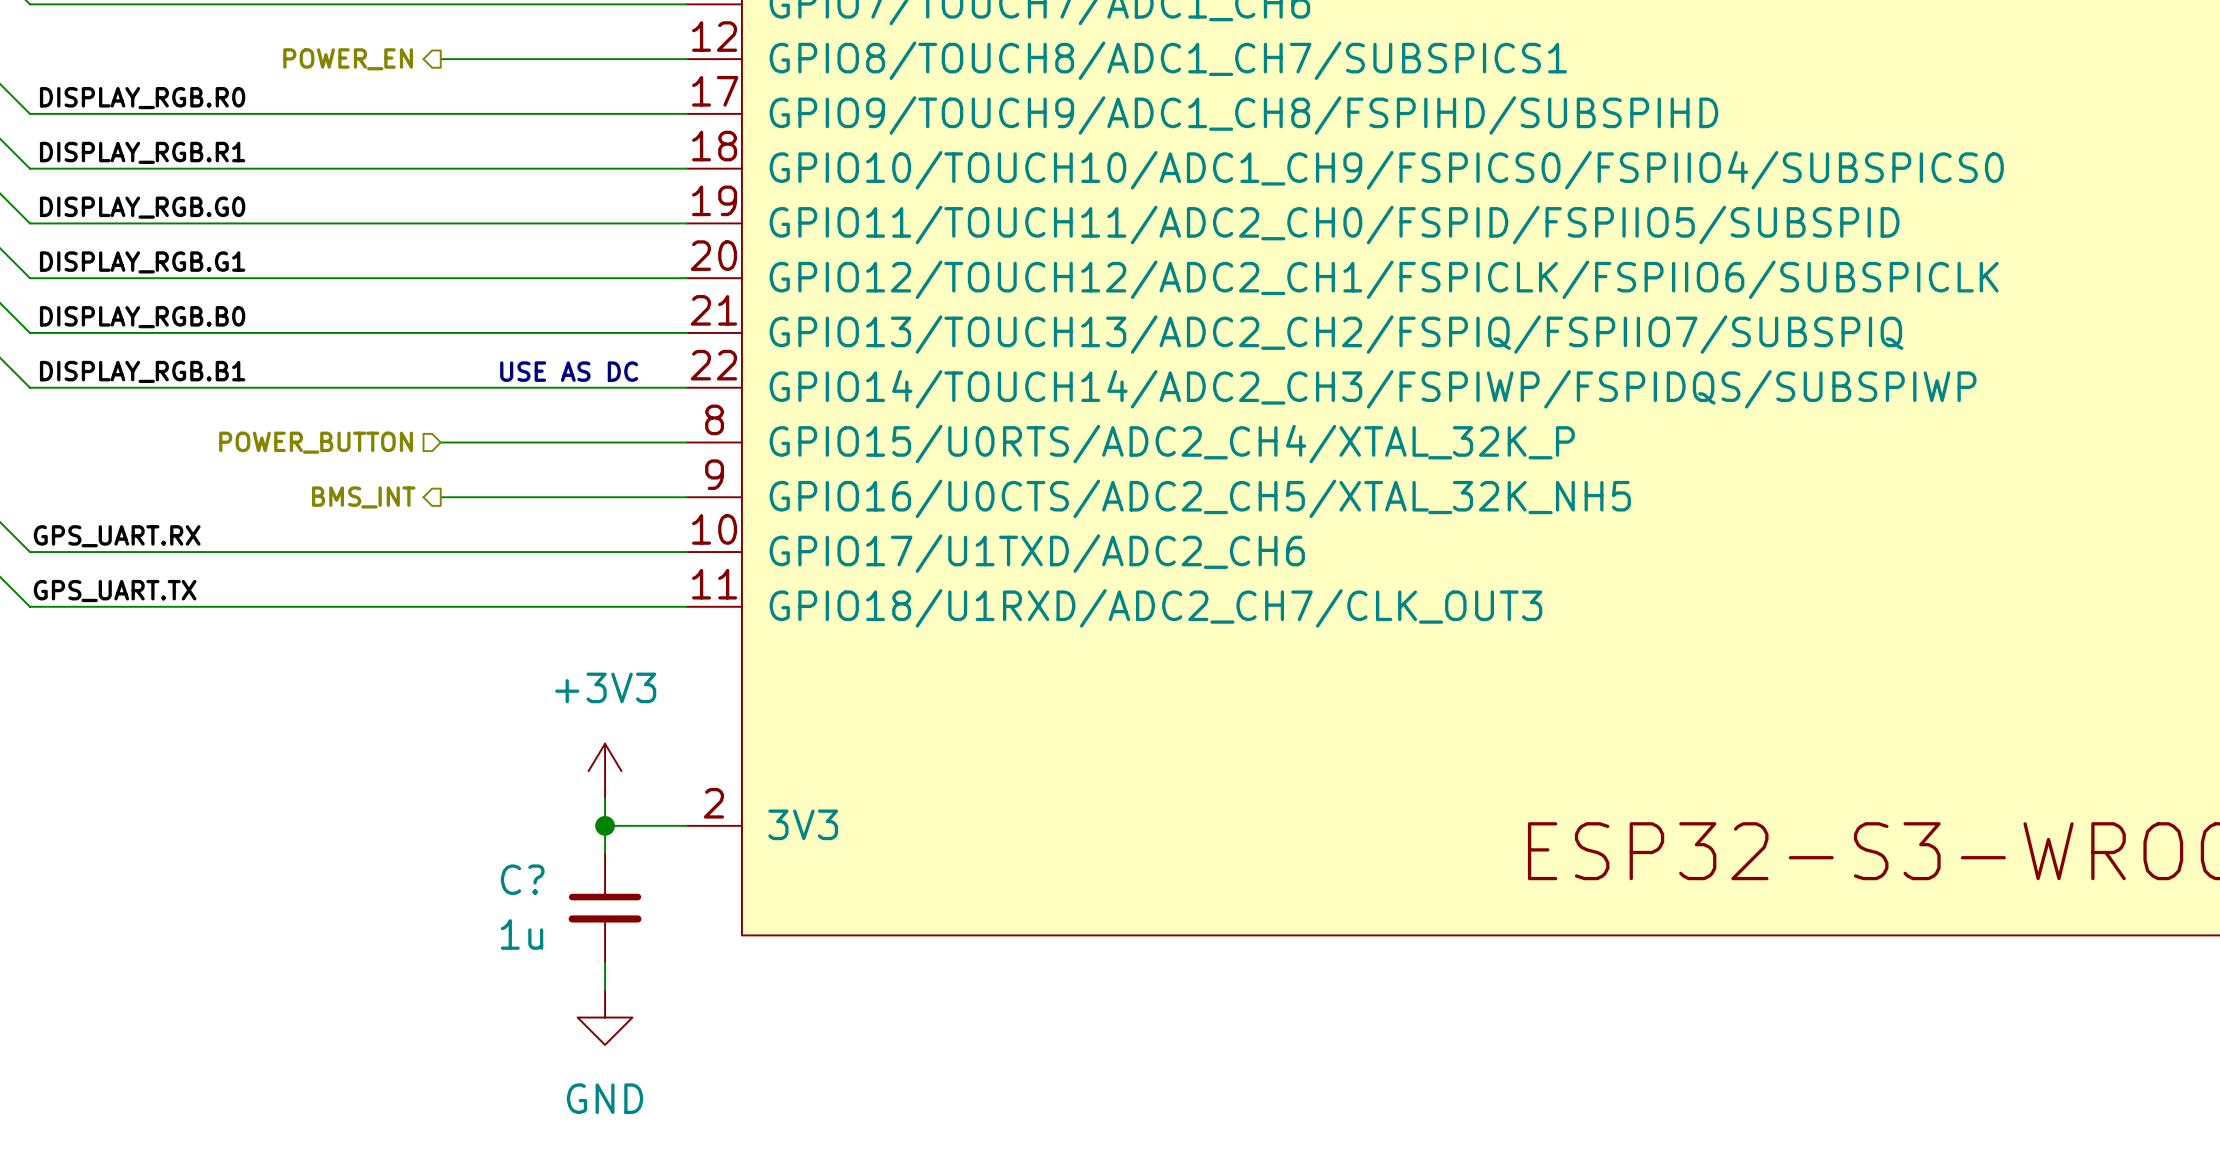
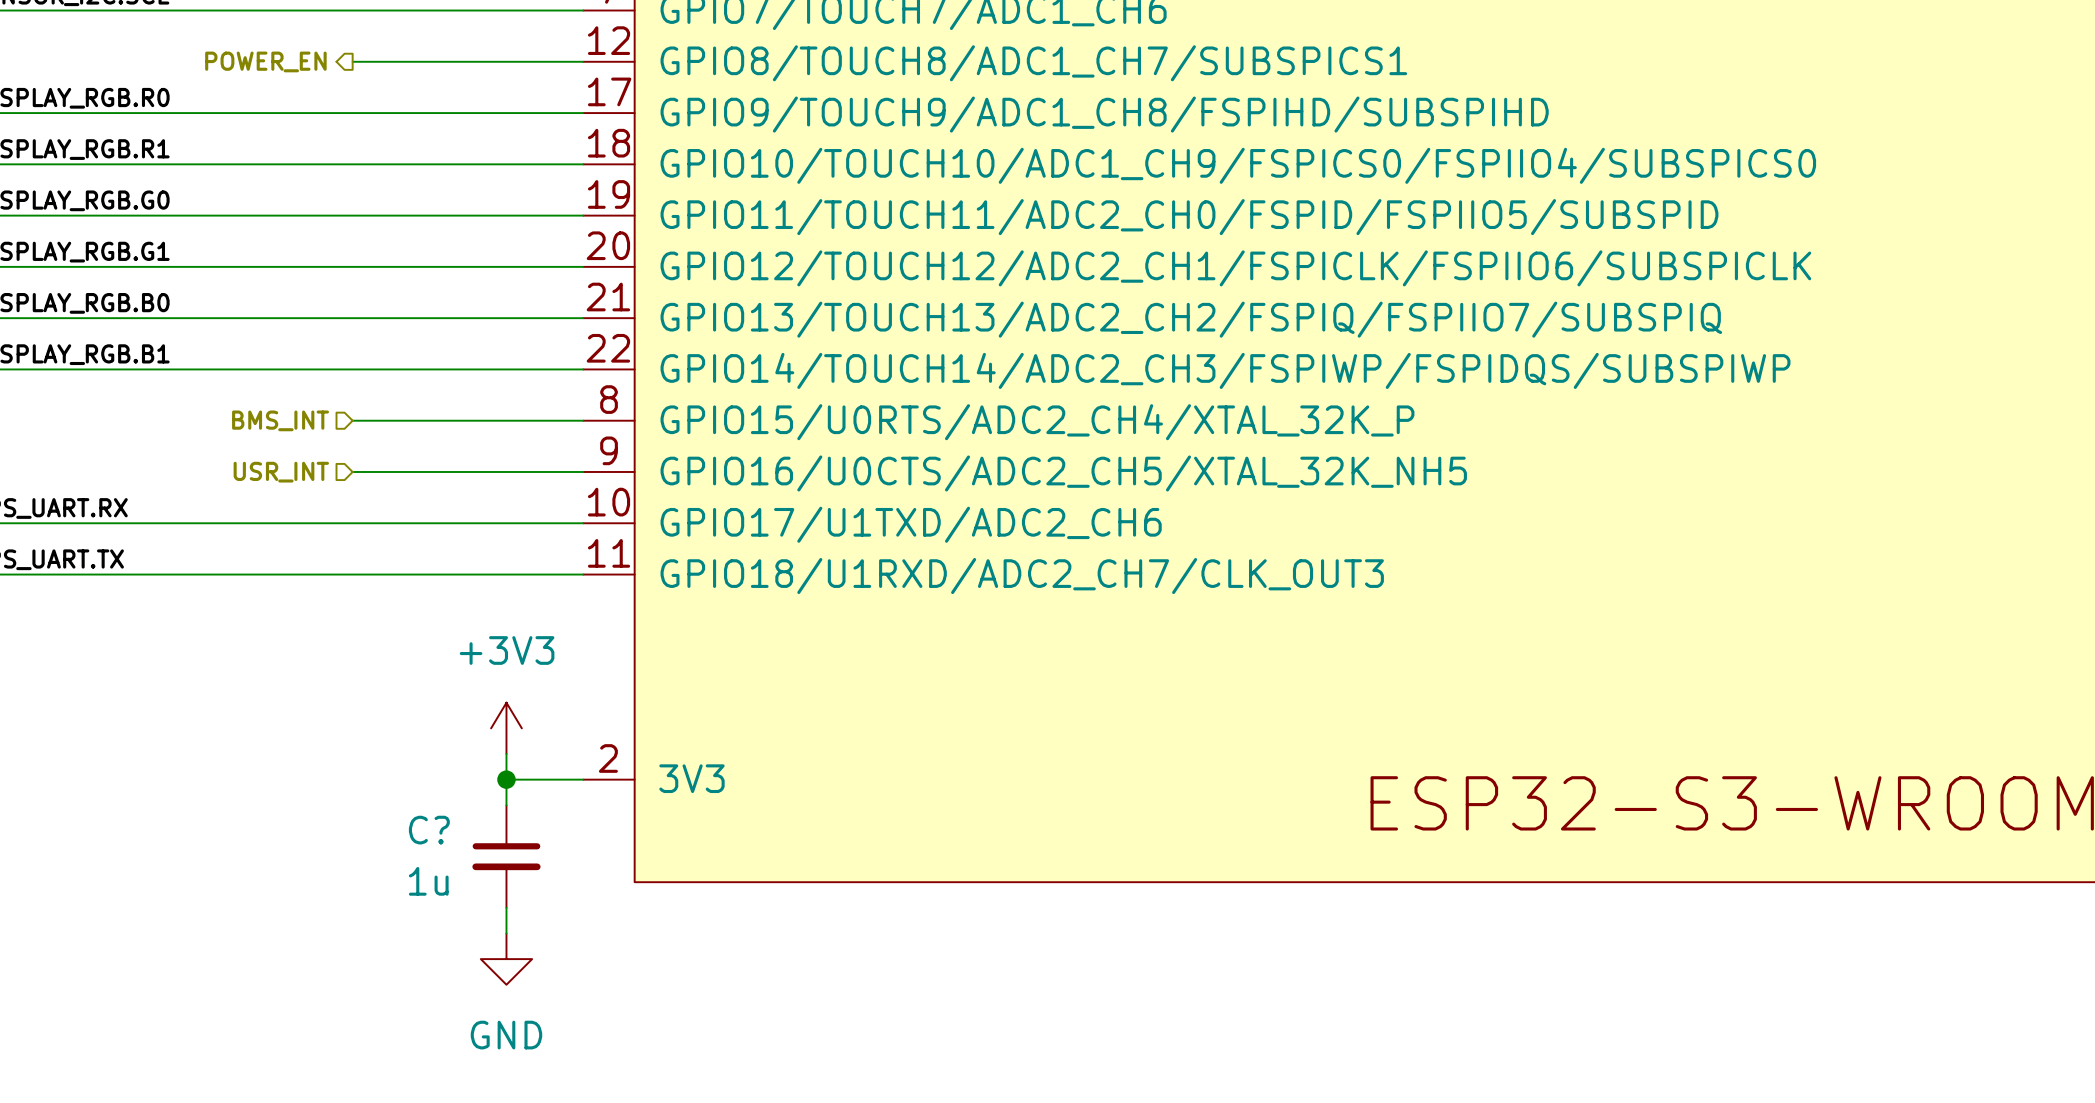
text: USE AS DC (569, 371) -> none
hierarchical label: POWER_BUTTON (316, 442) -> BMS_INT (280, 420)
hierarchical label shape: output (363, 497) -> input (281, 472)
hierarchical label: BMS_INT (363, 497) -> USR_INT (281, 472)

